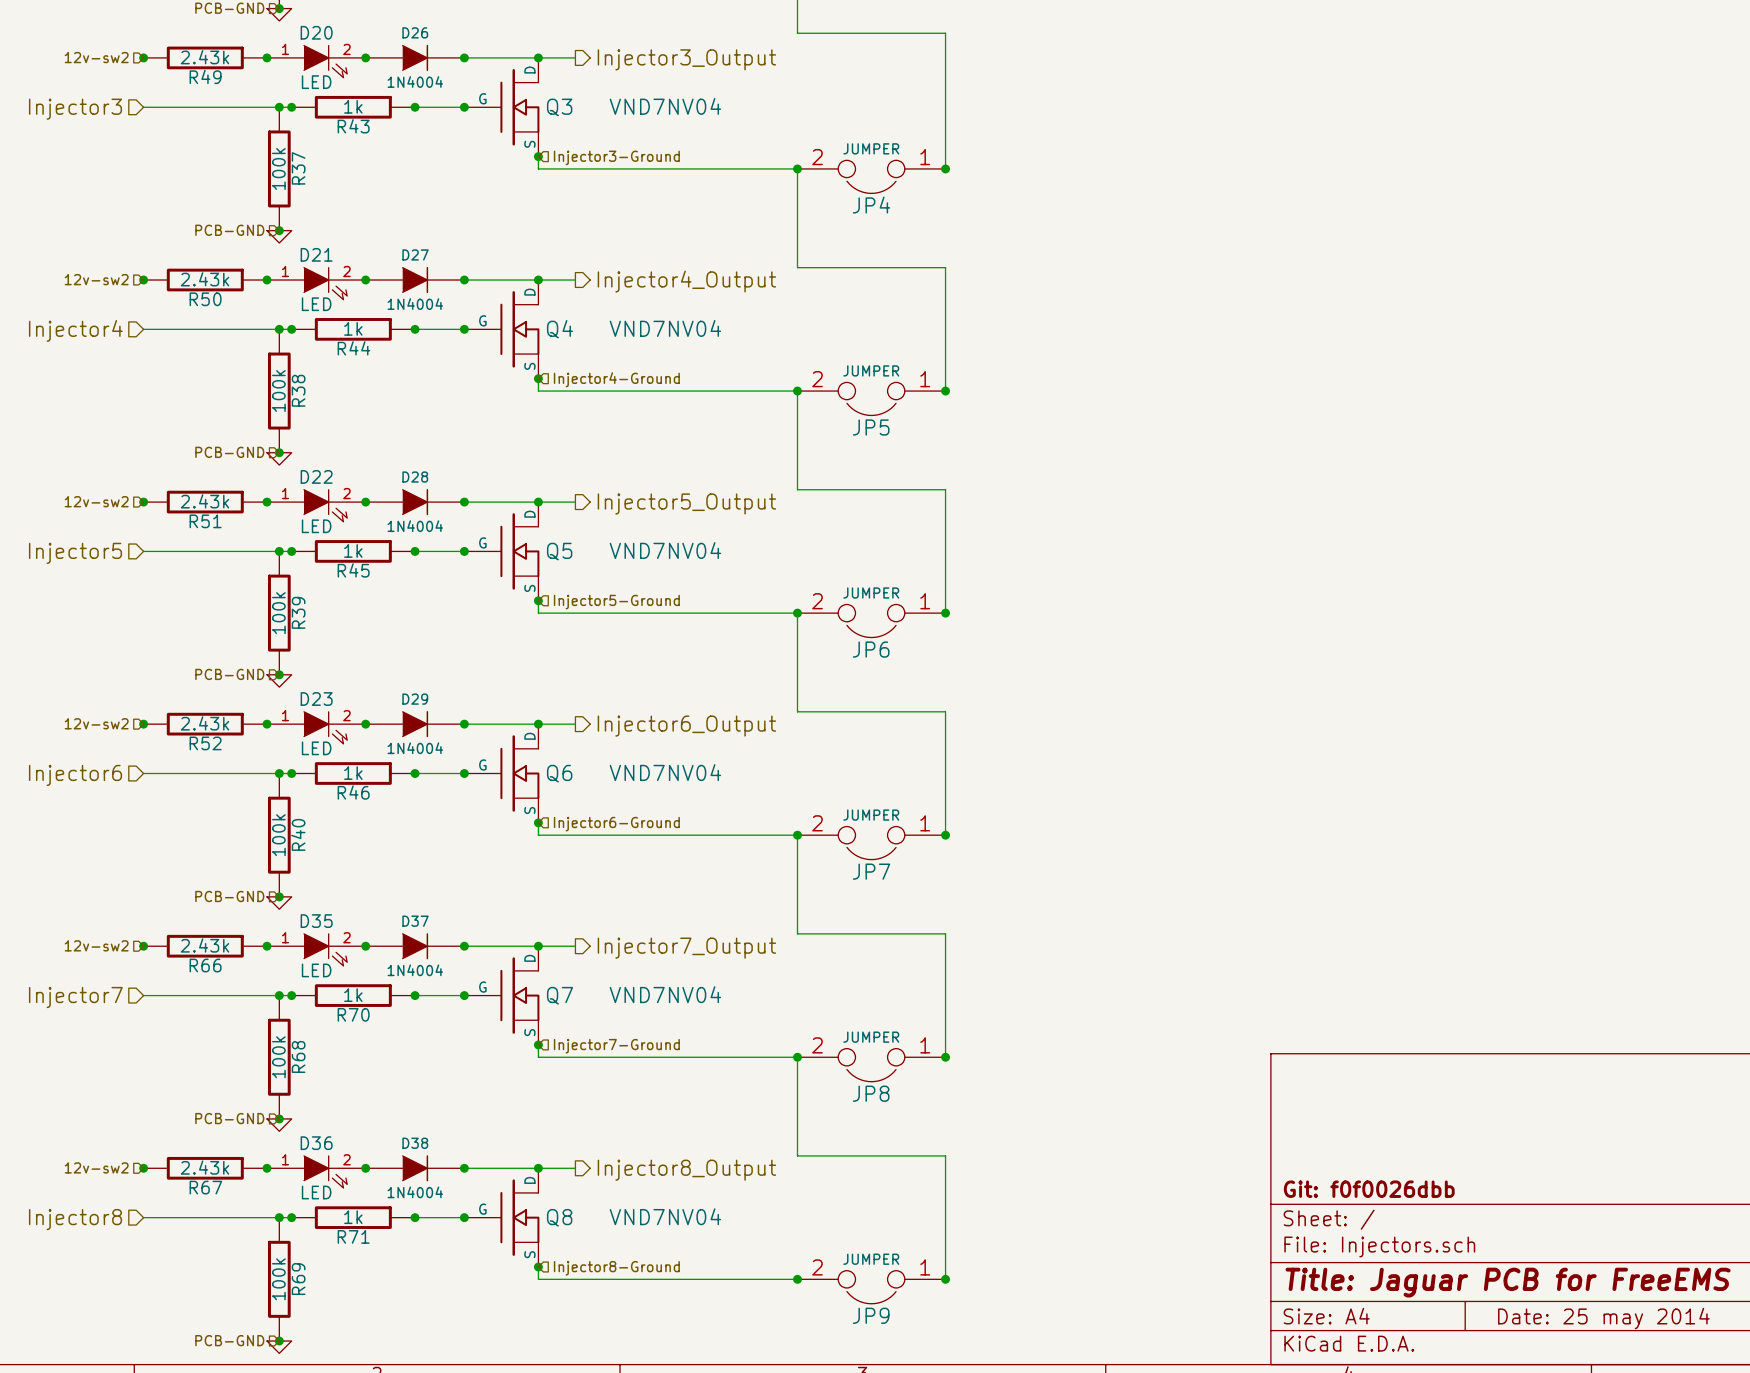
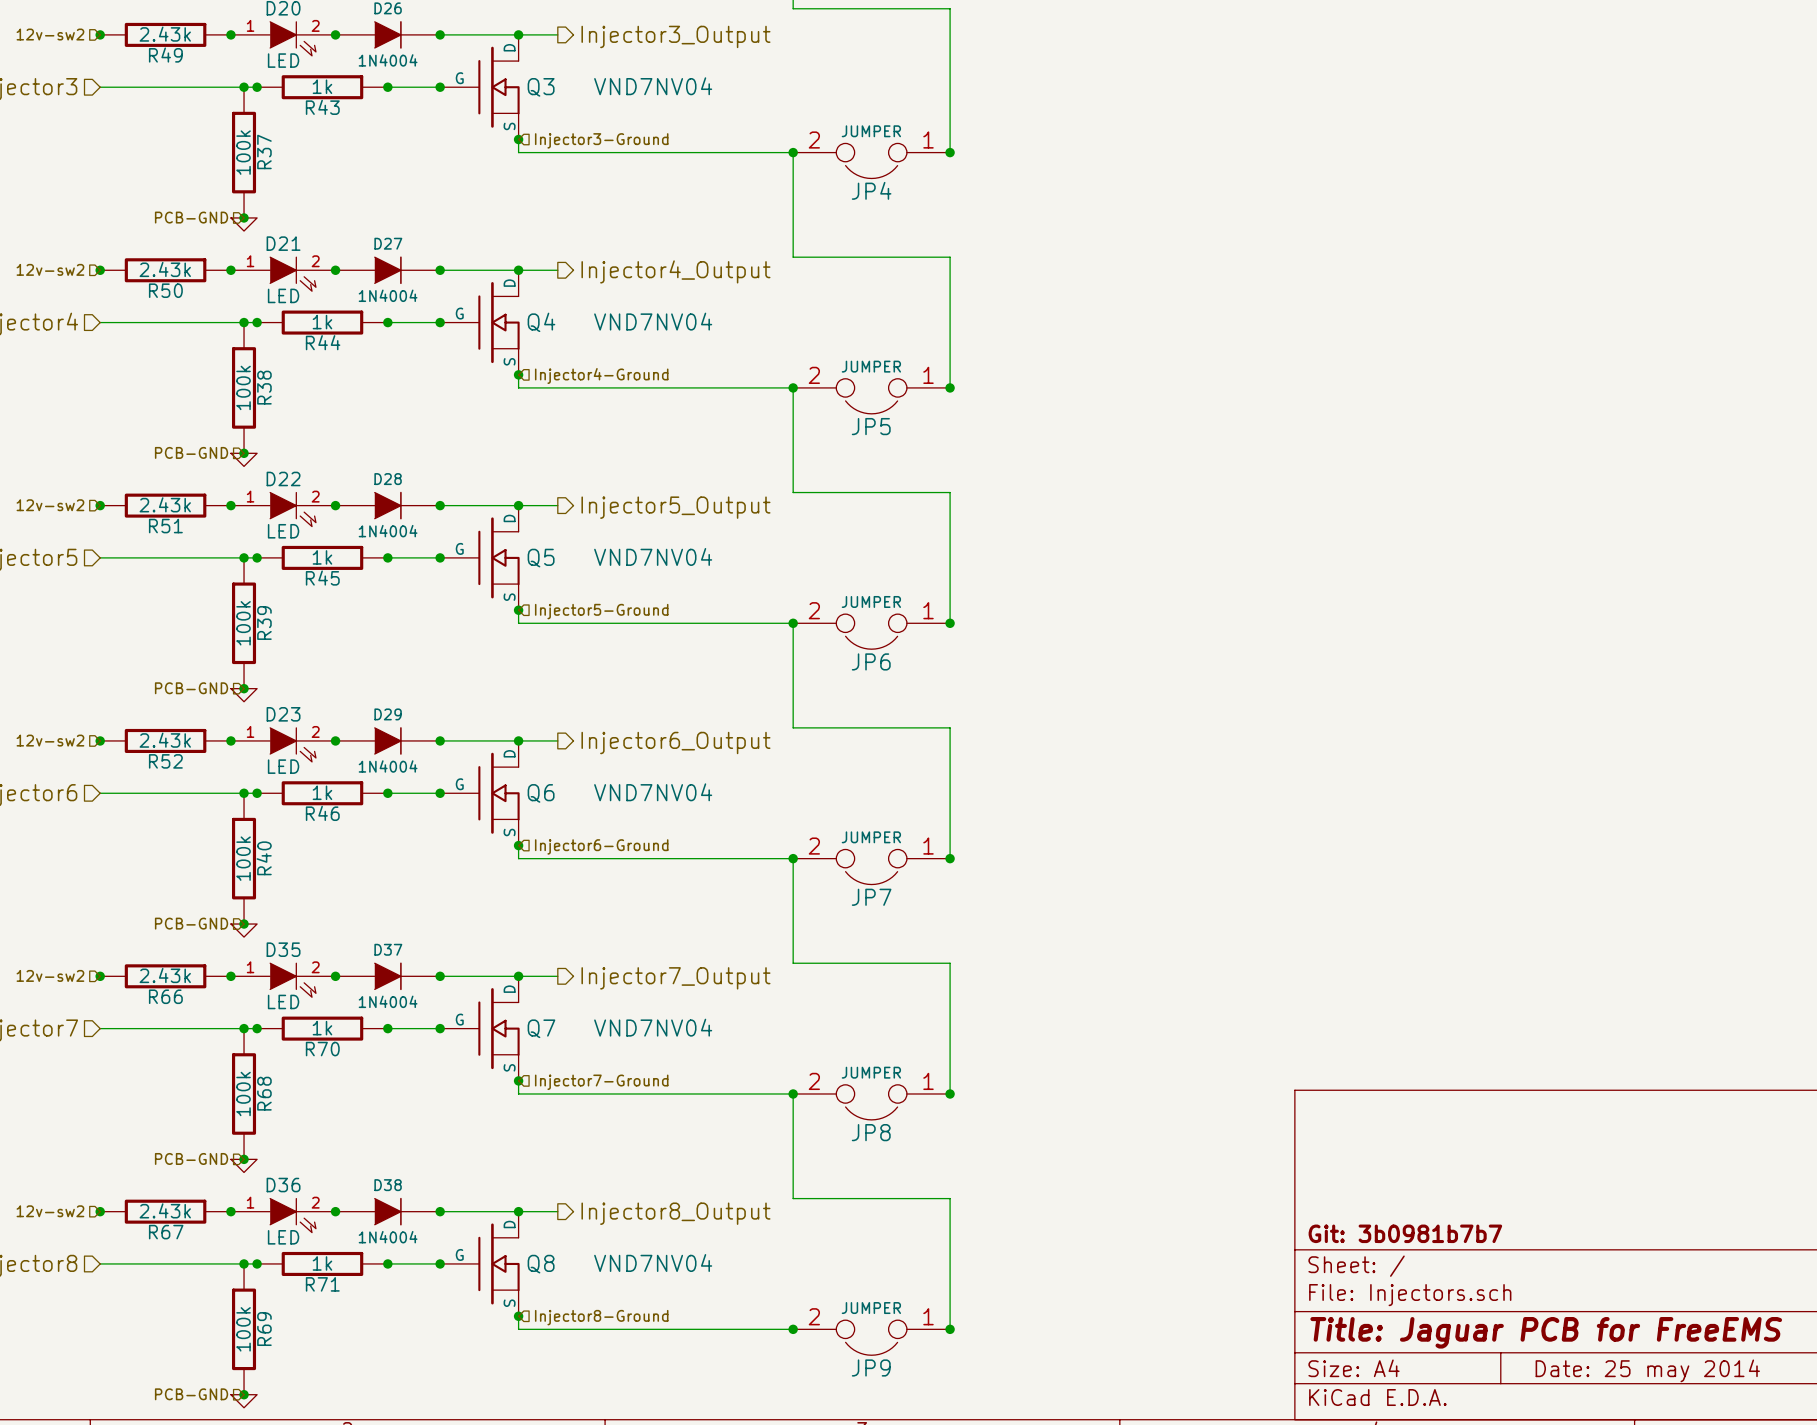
title block: Git: f0f0026dbb (1369, 1189) -> Git: 3b0981b7b7 (1405, 1233)

